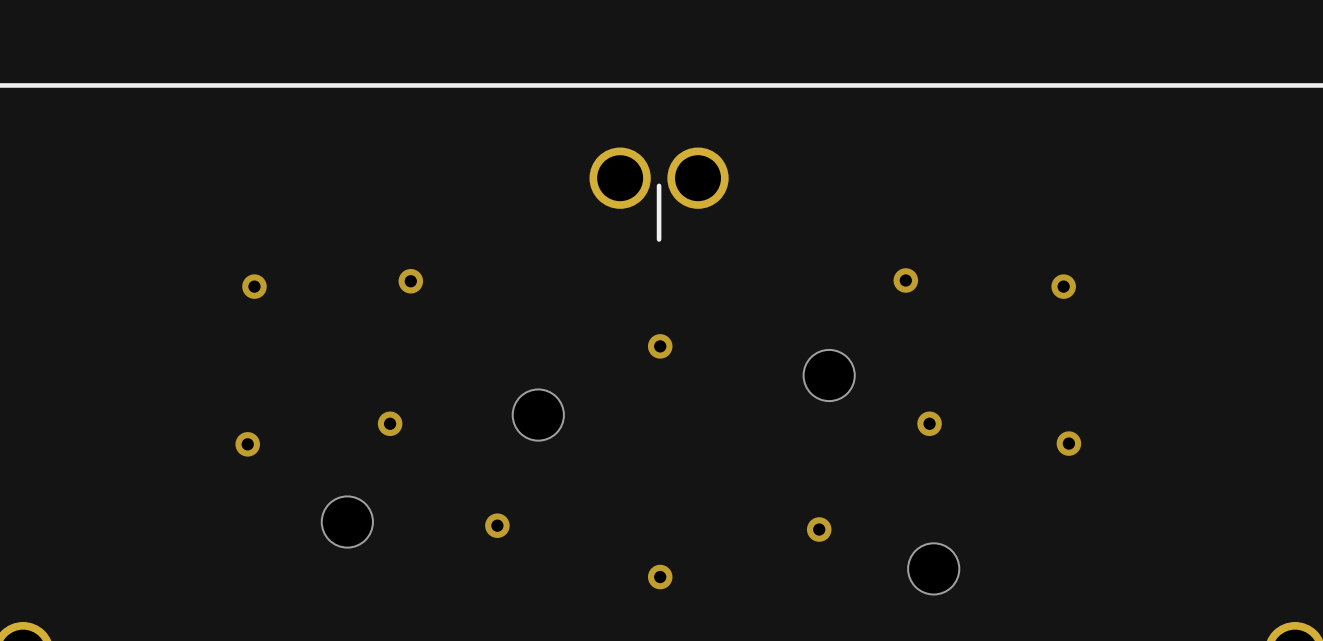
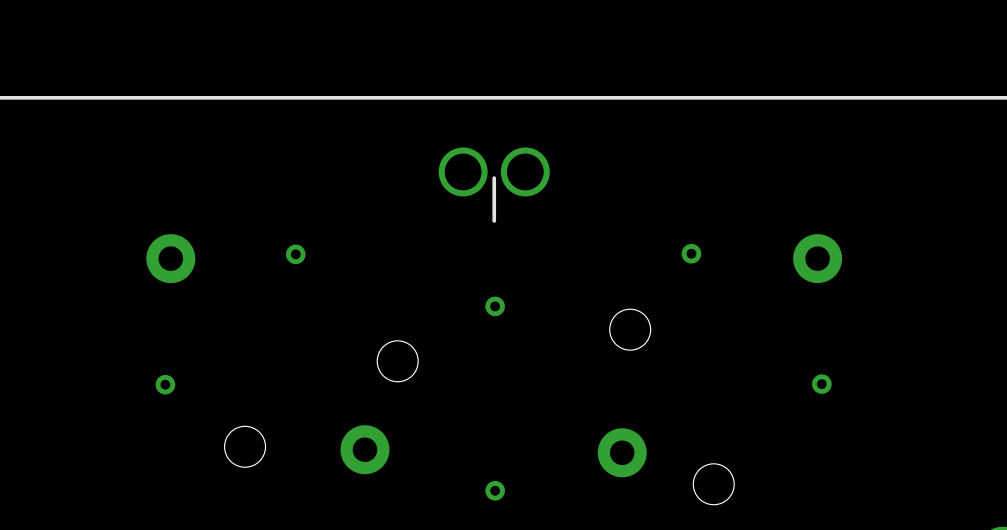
via size: [242, 274, 267, 299] -> [146, 234, 196, 284]
via size: [1051, 274, 1076, 299] -> [793, 234, 843, 284]
via: (390, 423) -> none
via: (929, 423) -> none
via size: [485, 513, 510, 538] -> [340, 425, 390, 475]
via size: [806, 517, 832, 542] -> [597, 428, 647, 478]

